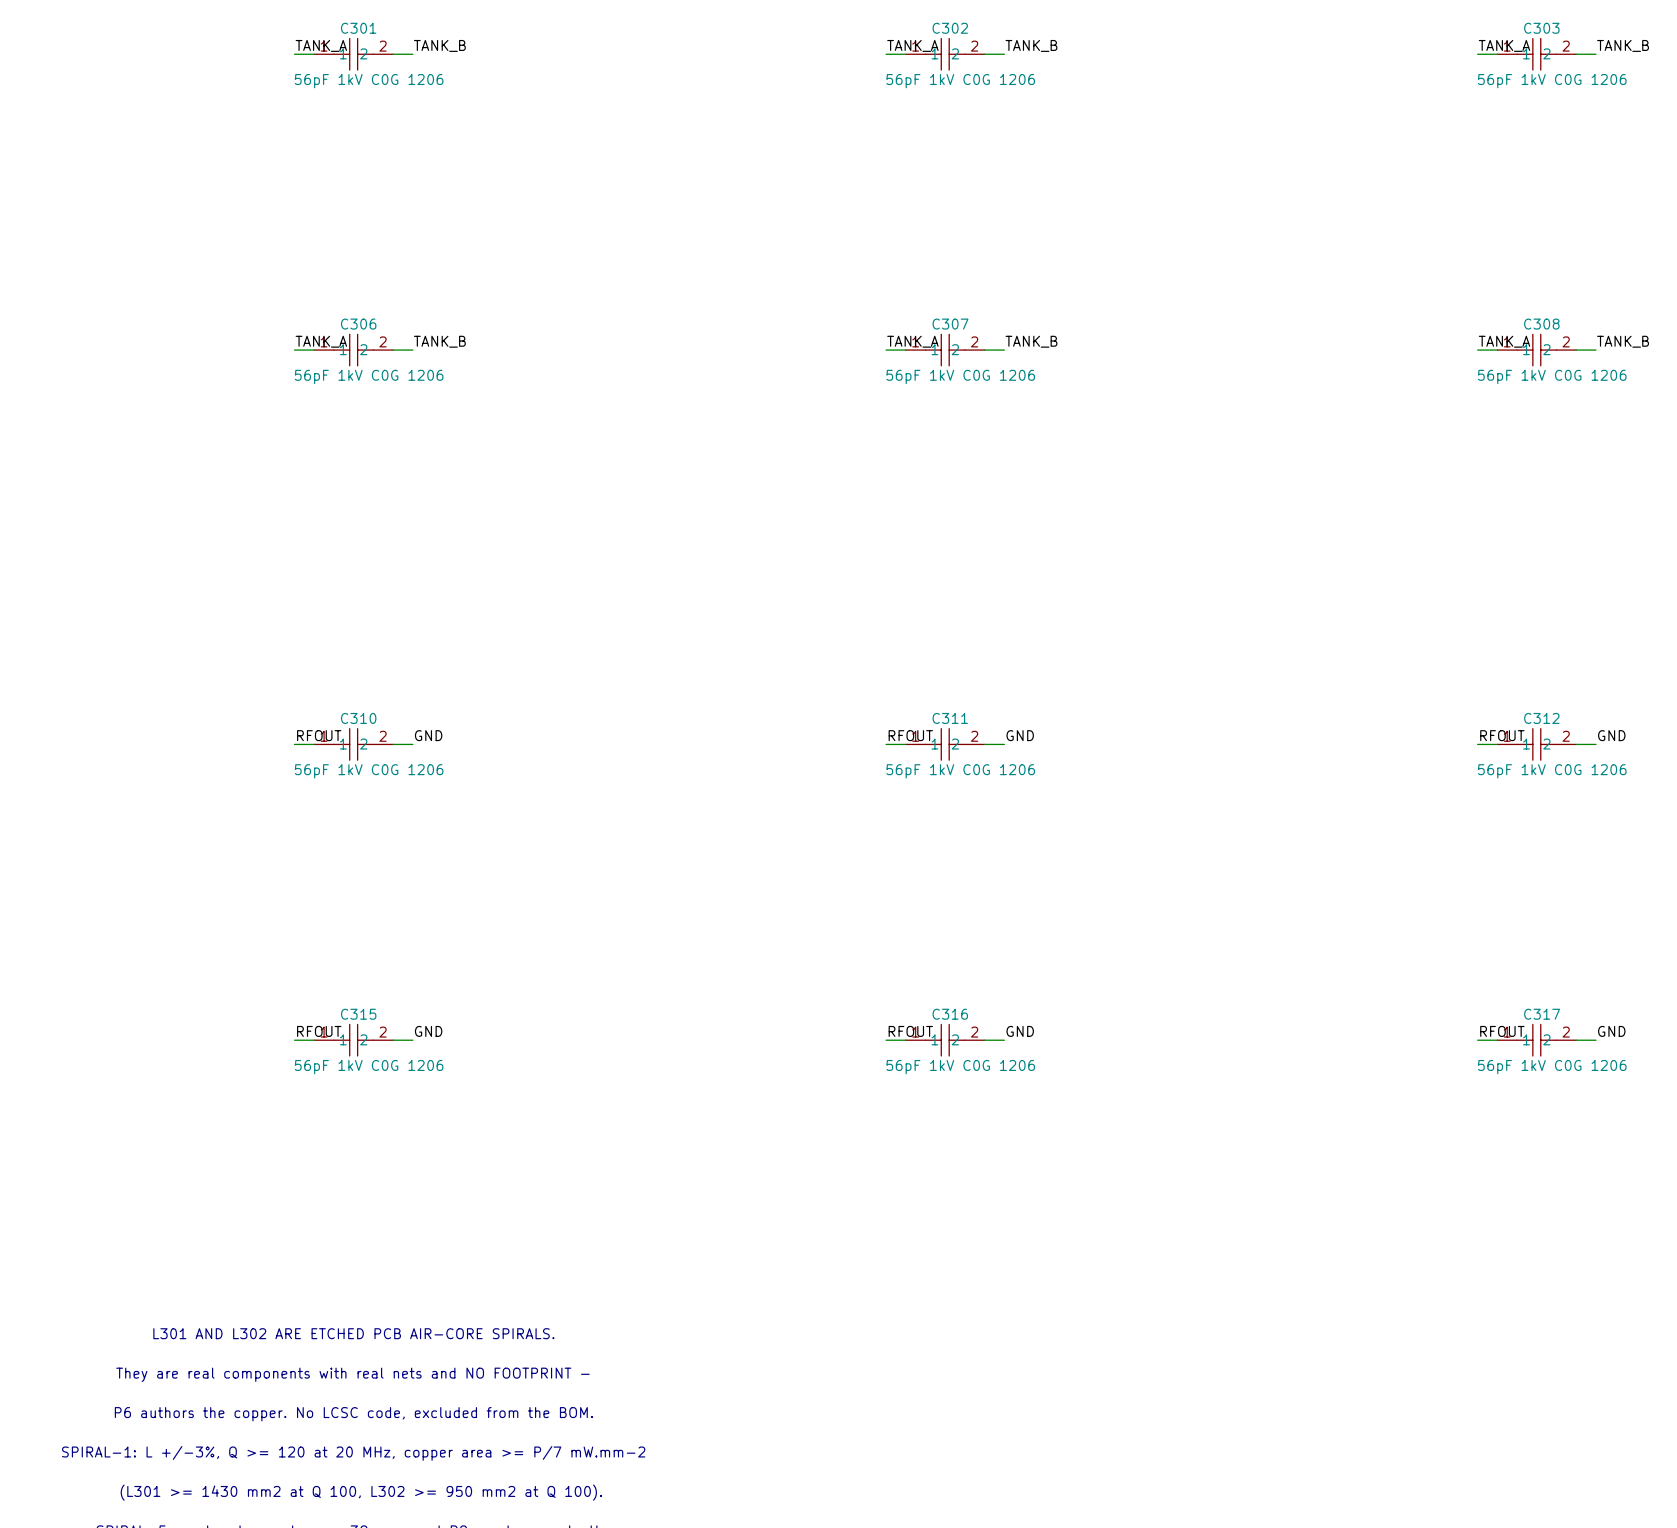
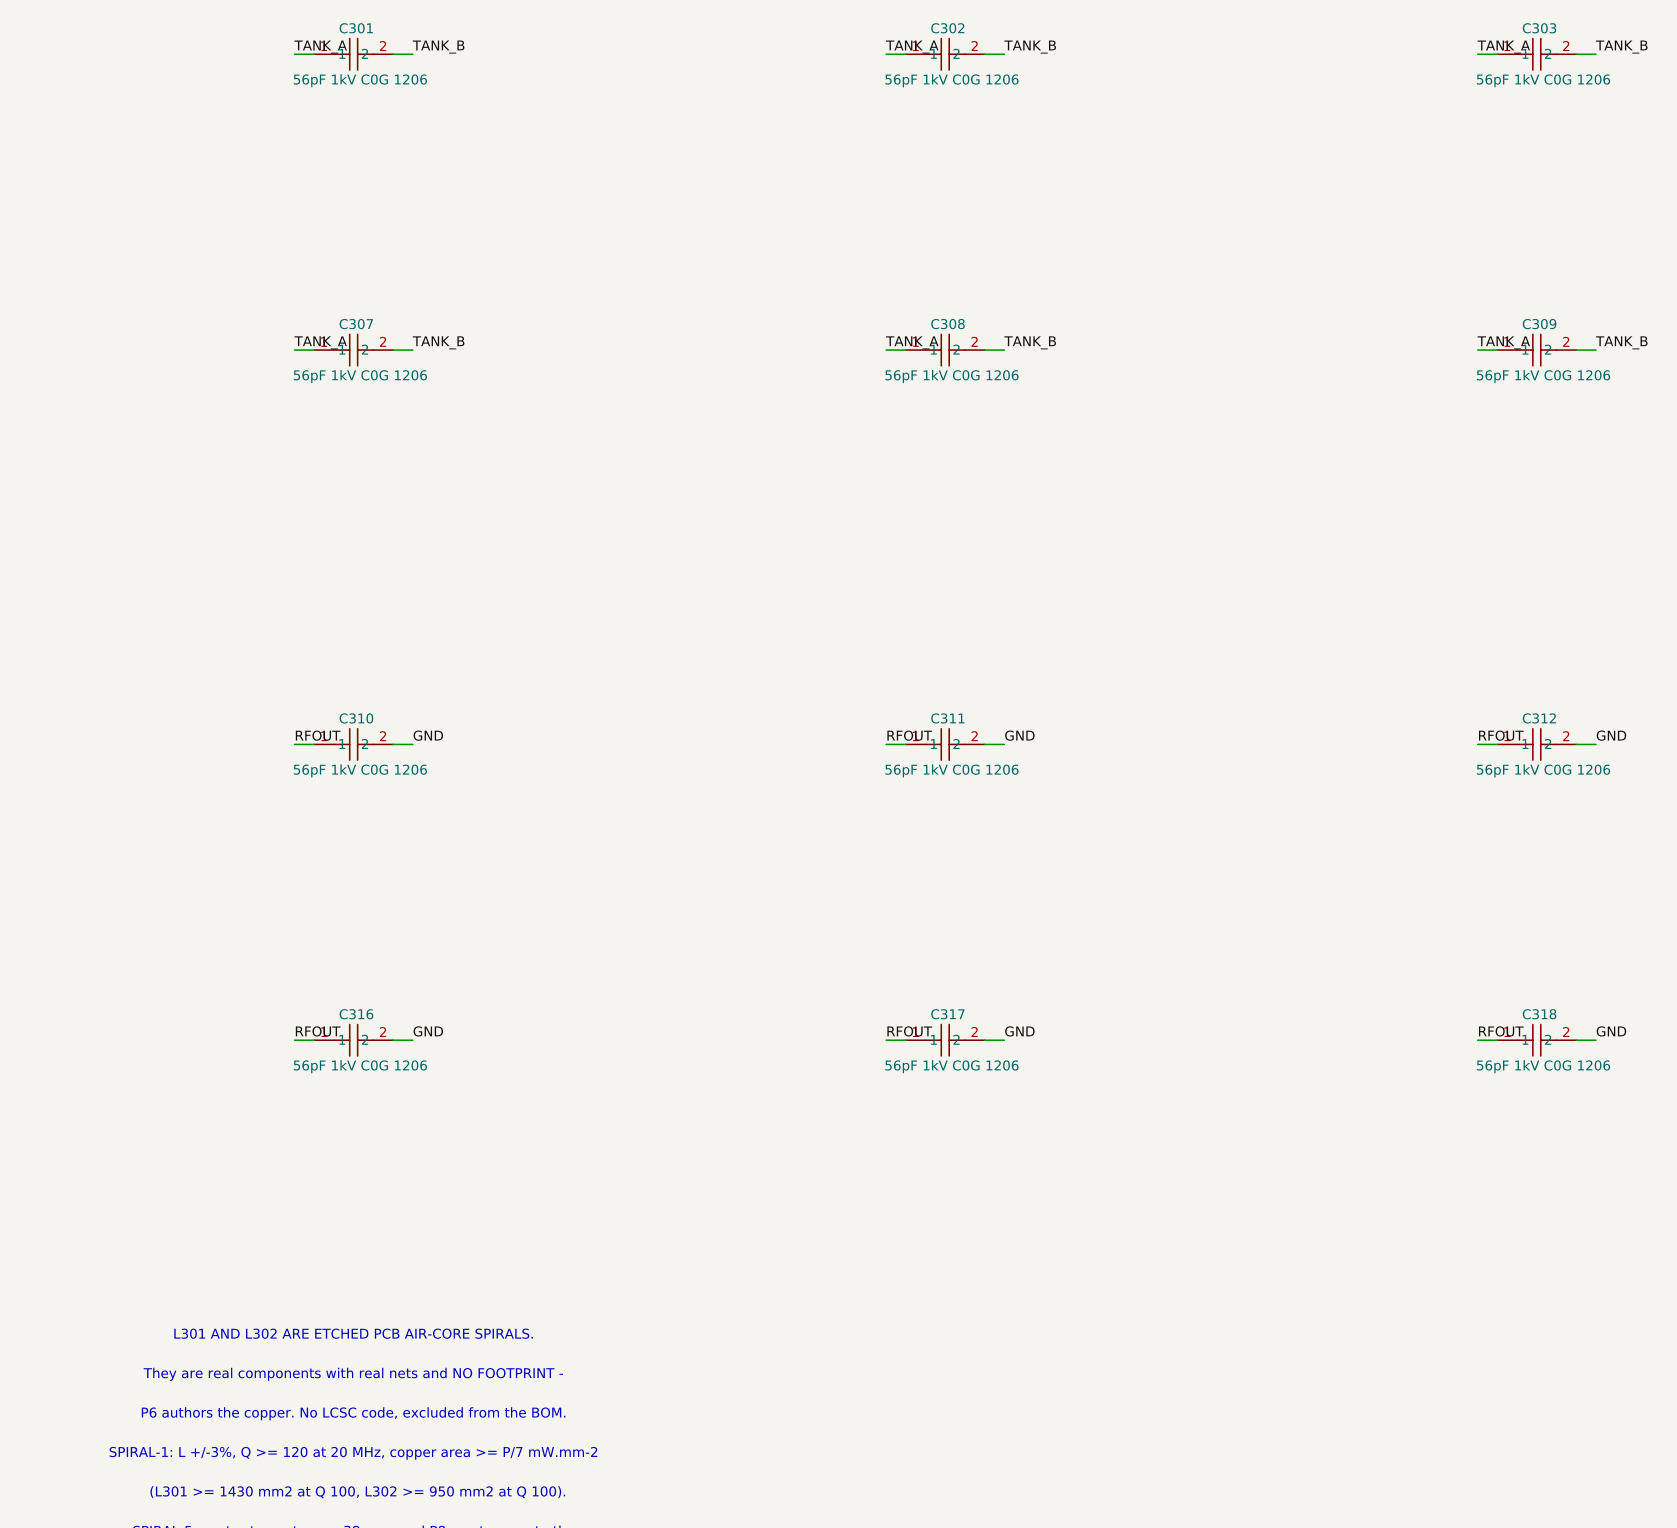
C306 name: C306 (358, 324) -> C307 (356, 324)
C307 name: C307 (950, 324) -> C308 (948, 324)
C308 name: C308 (1541, 324) -> C309 (1539, 324)
C315 name: C315 (358, 1014) -> C316 (356, 1014)
C316 name: C316 (950, 1014) -> C317 (947, 1014)
C317 name: C317 (1542, 1014) -> C318 (1539, 1014)

